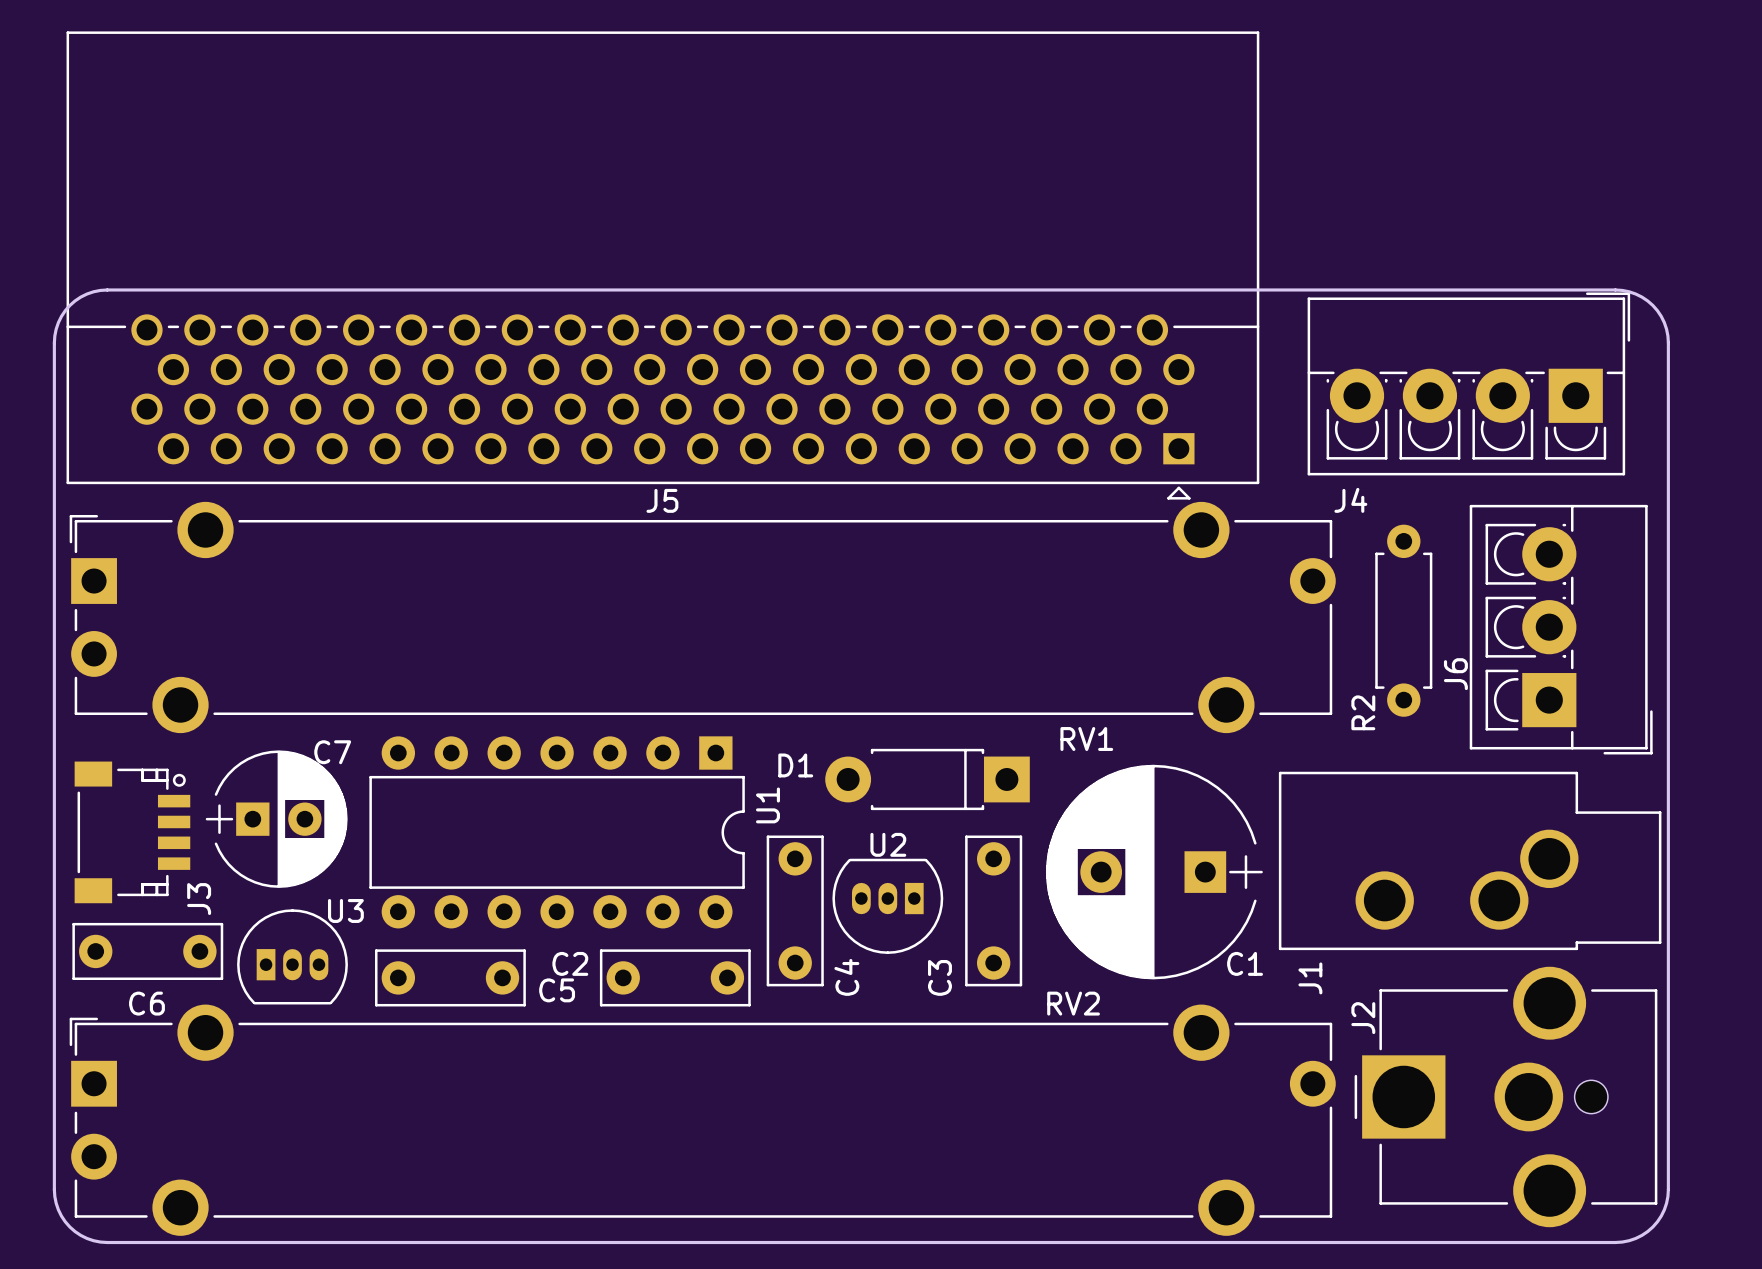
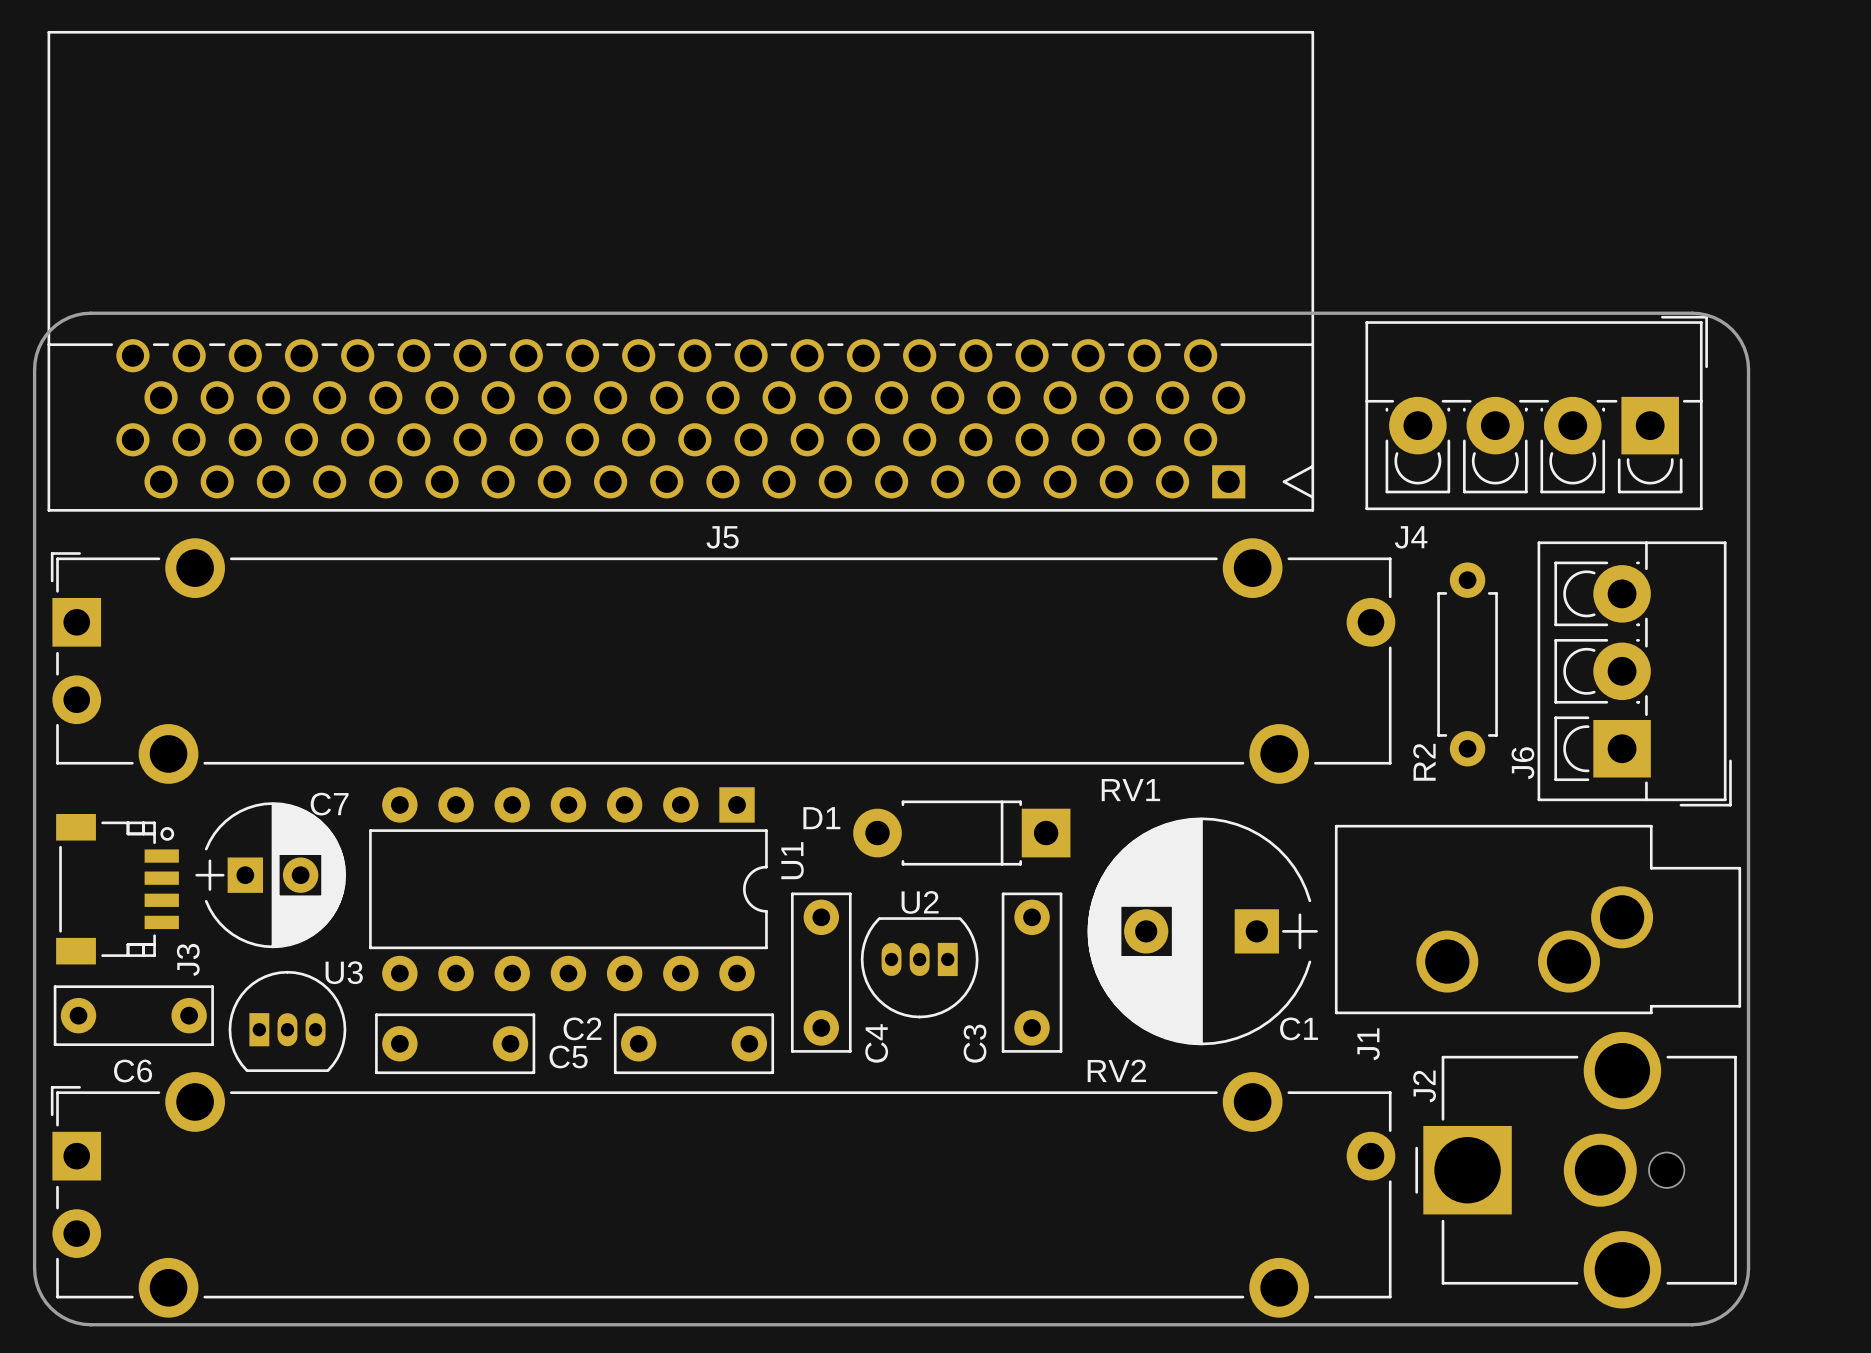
J5 footprint: [66, 31, 1260, 500] -> [47, 30, 1315, 512]
J5 name position: J5 (662, 500) -> J5 (722, 537)
J6 name position: J6 (1455, 674) -> J6 (1522, 763)

